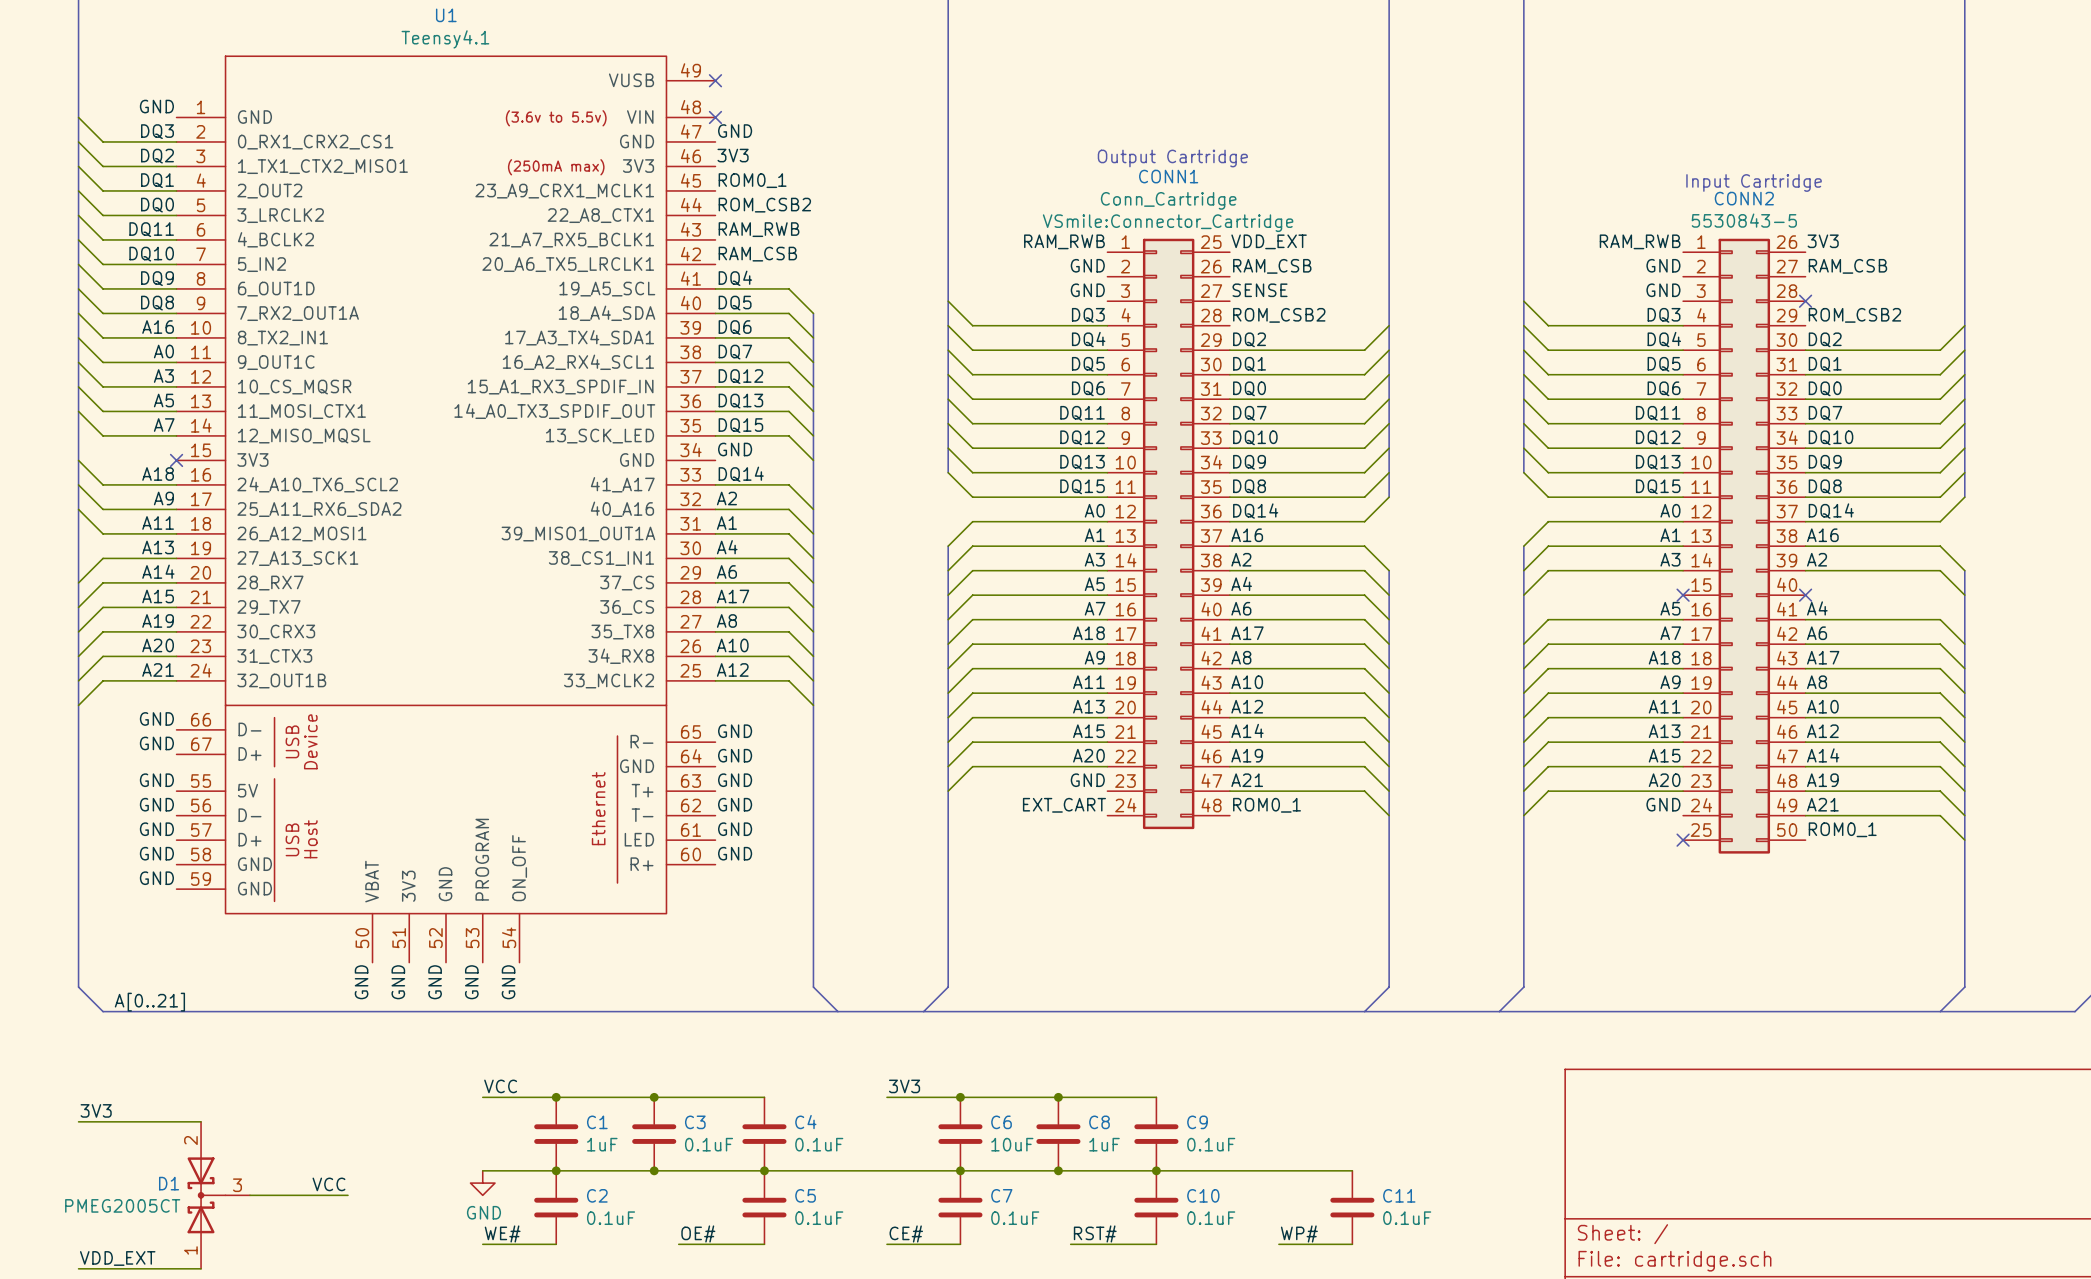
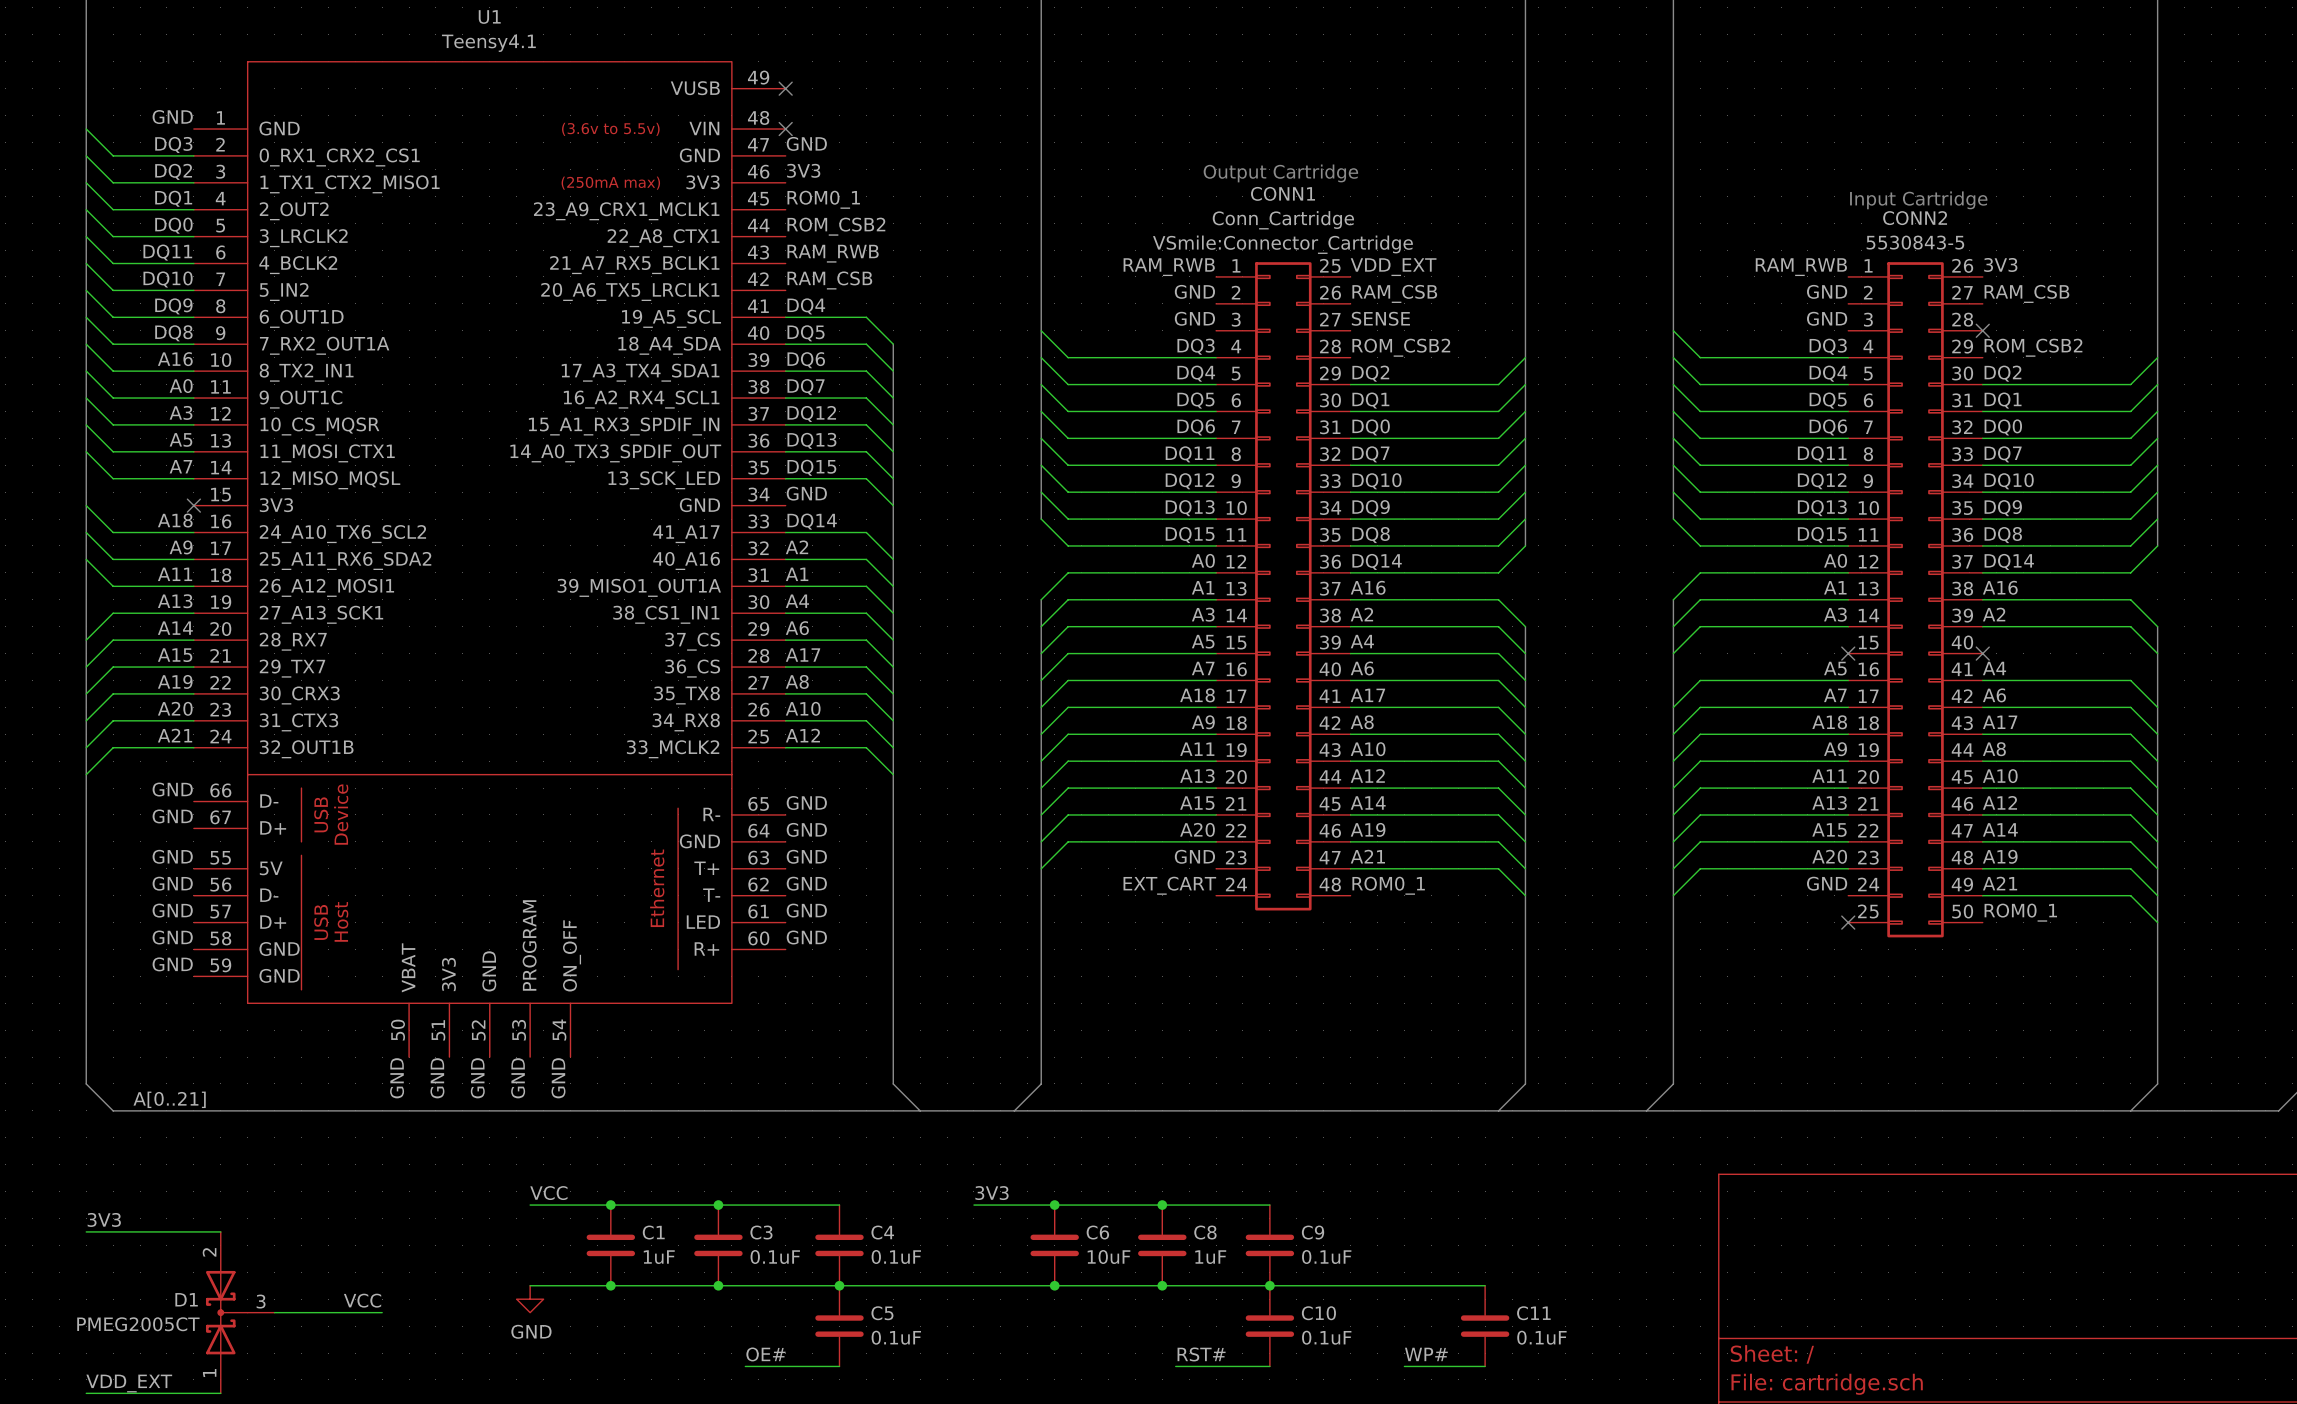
C2: 0.1uF (556, 1207) -> none
C7: 0.1uF (960, 1207) -> none
label: WE# (502, 1233) -> none
label: CE# (906, 1233) -> none
wire: (482, 1244) (556, 1244) -> none
wire: (886, 1244) (960, 1244) -> none

